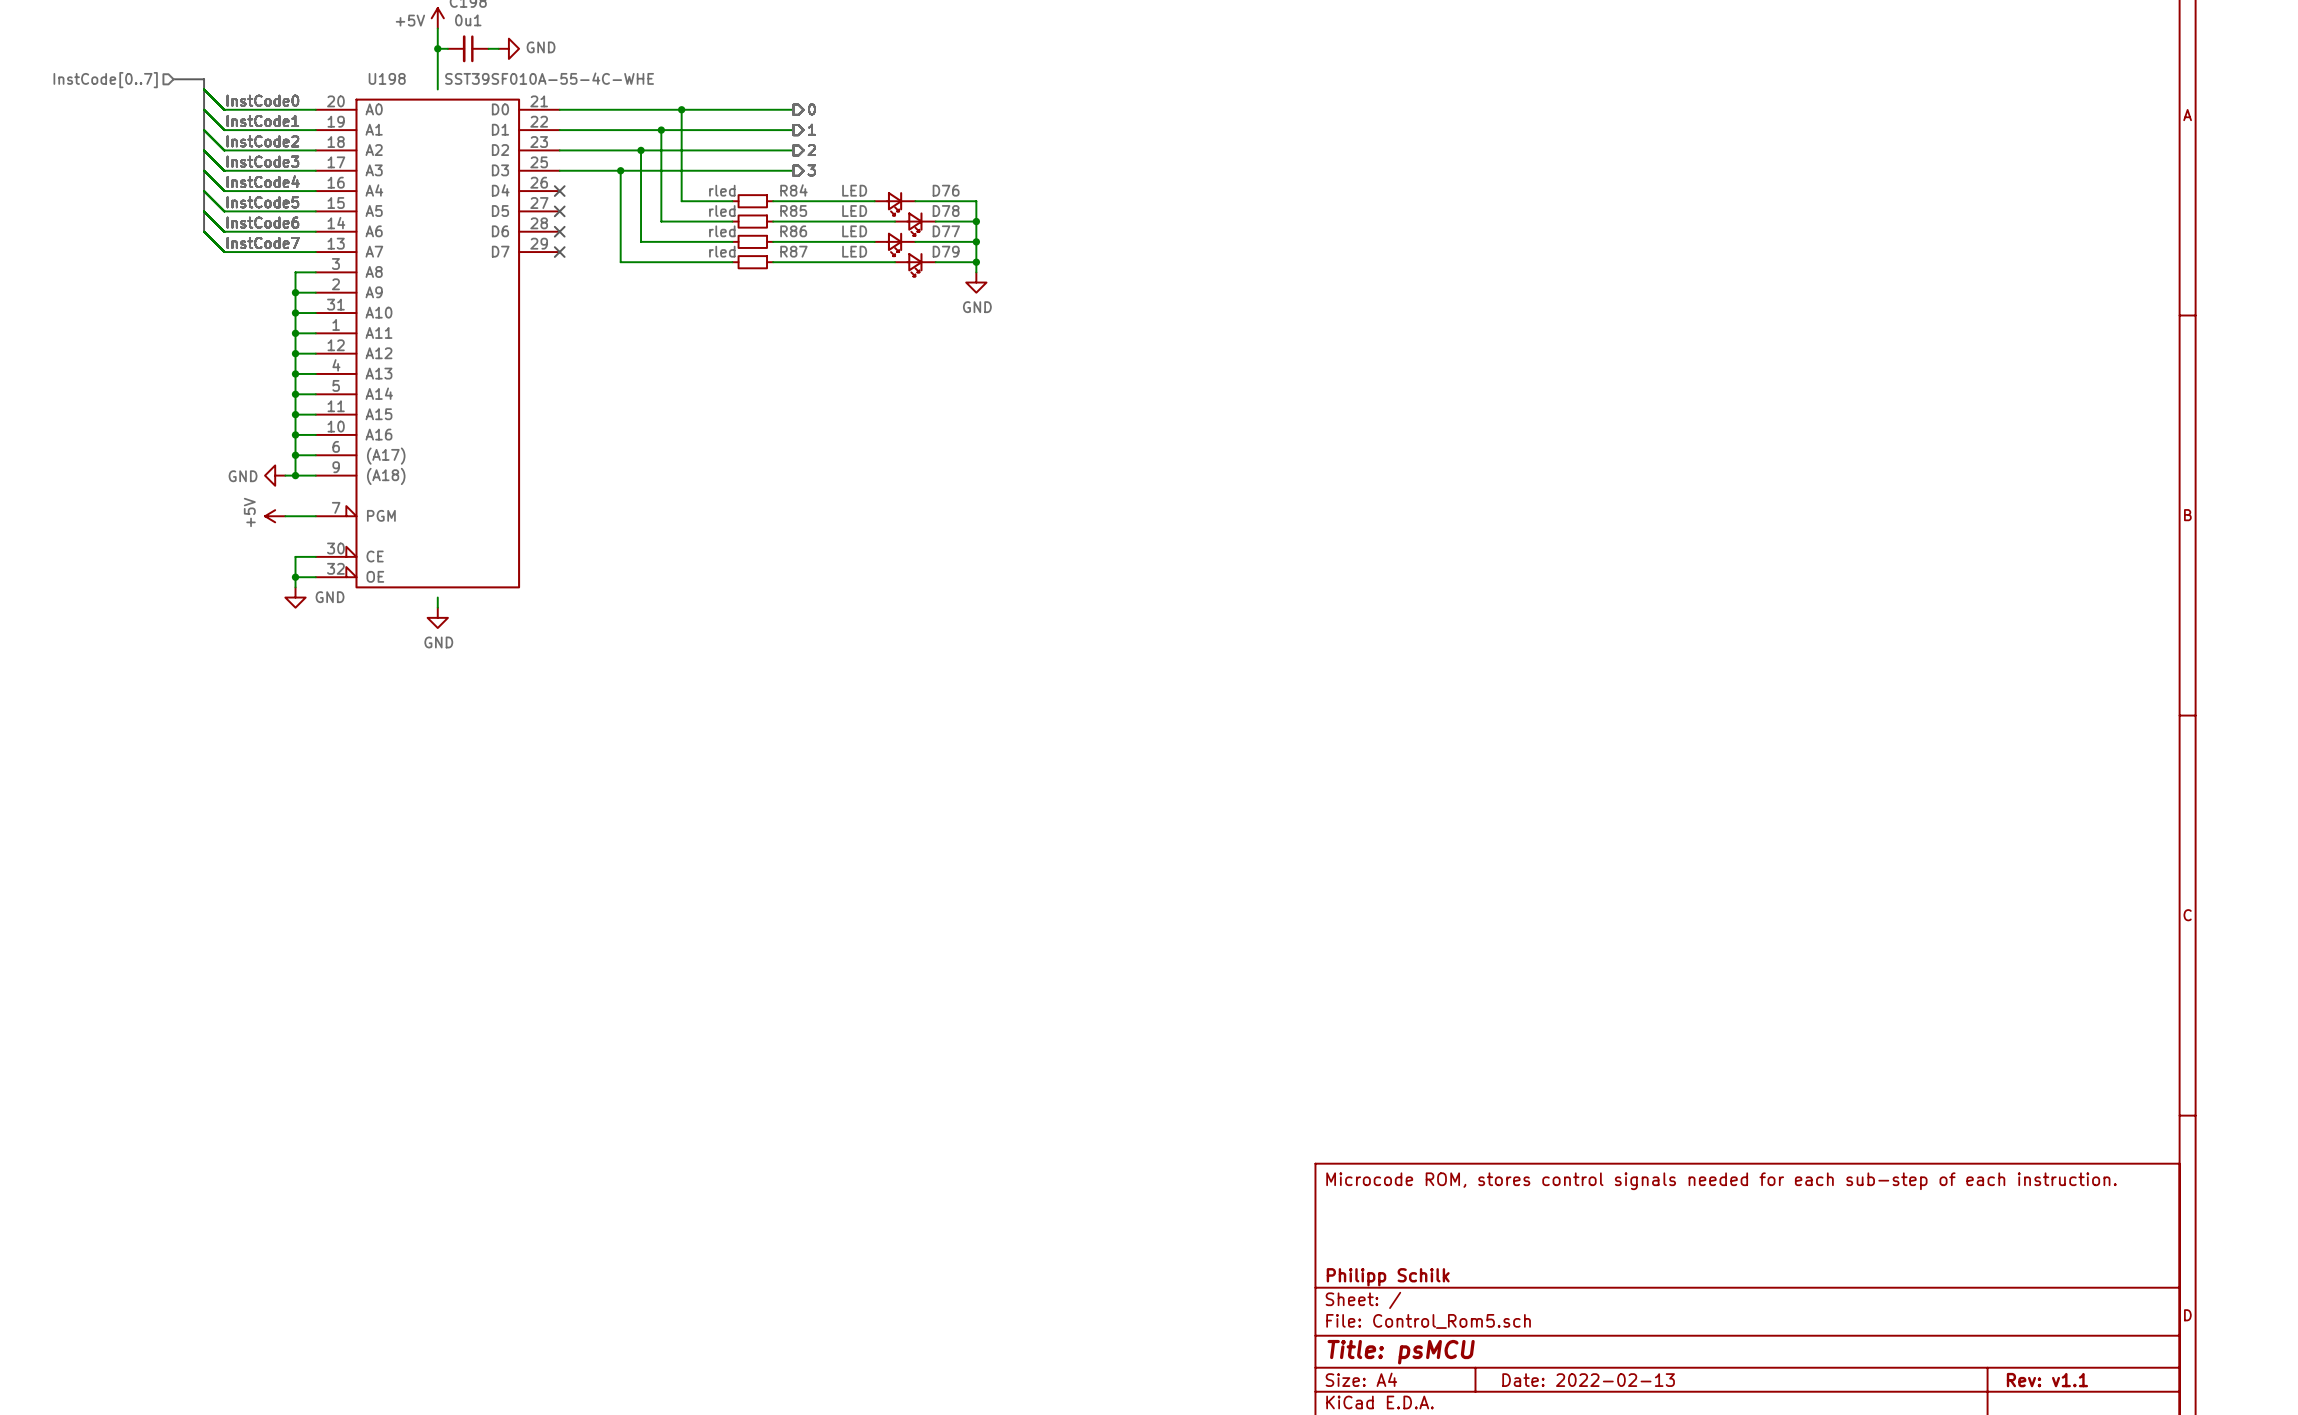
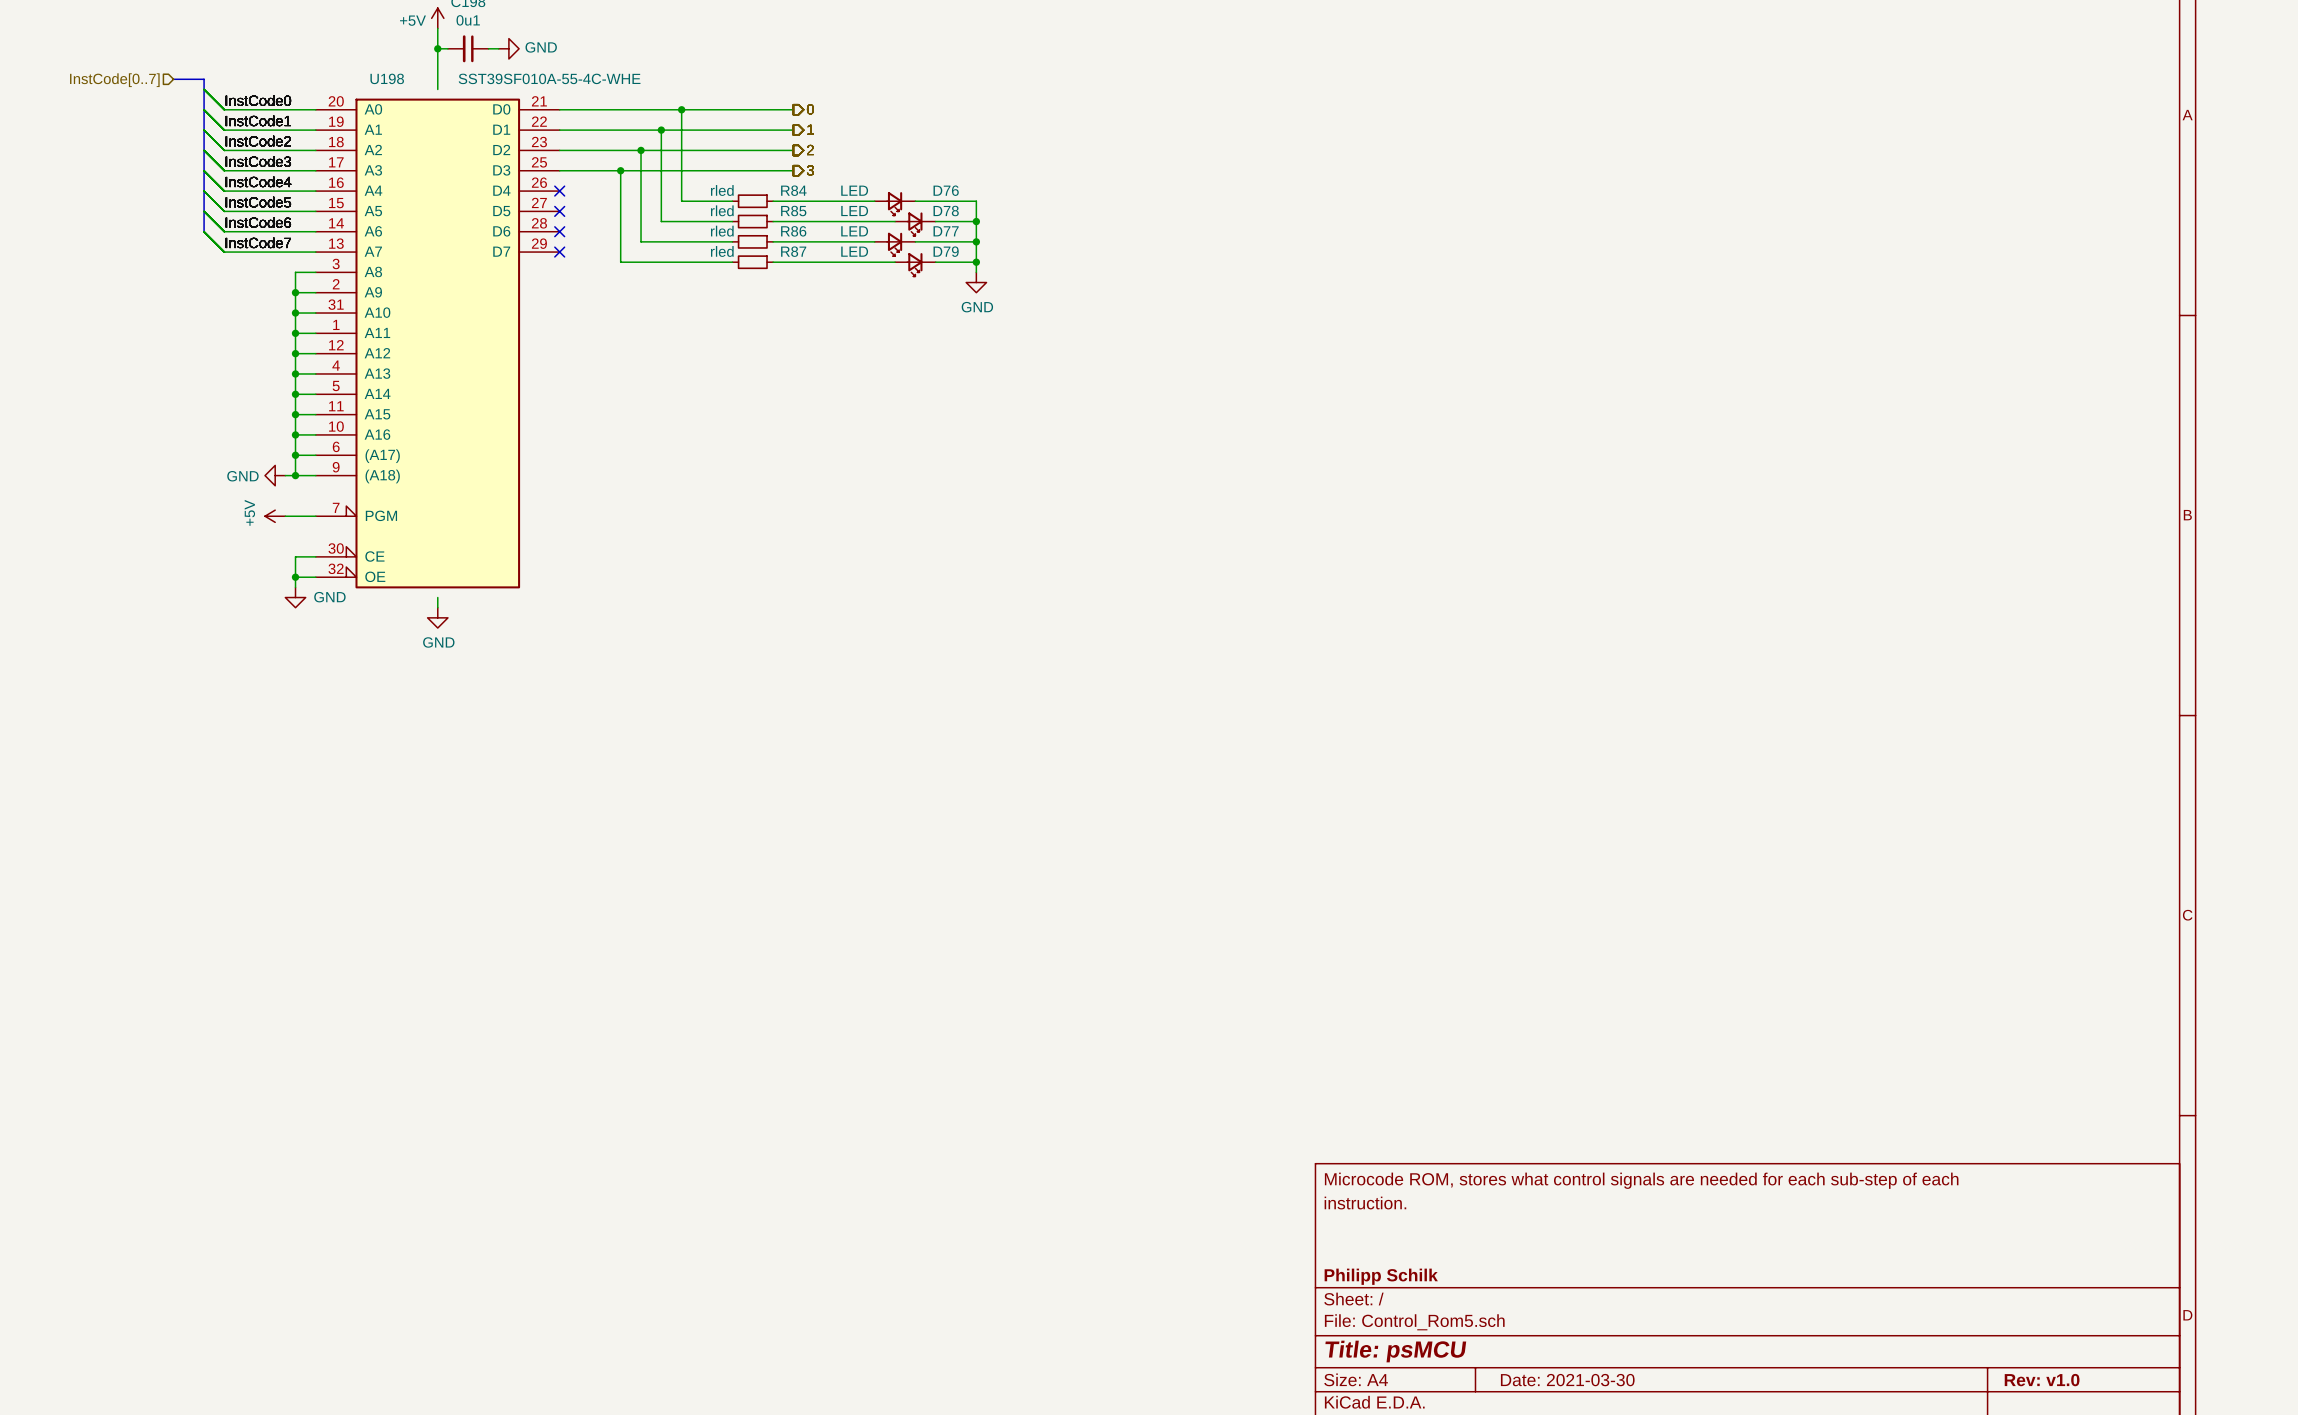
title block: Microcode ROM, stores control signals needed for each sub-step of each instruction. (1721, 1181) -> Microcode ROM, stores what control signals are needed for each sub-step of each (1641, 1180)
title block: none -> instruction. (1365, 1203)
title block: Date: 2022-02-13 (1588, 1380) -> Date: 2021-03-30 (1567, 1380)
title block: Rev: v1.1 (2047, 1380) -> Rev: v1.0 (2042, 1380)

